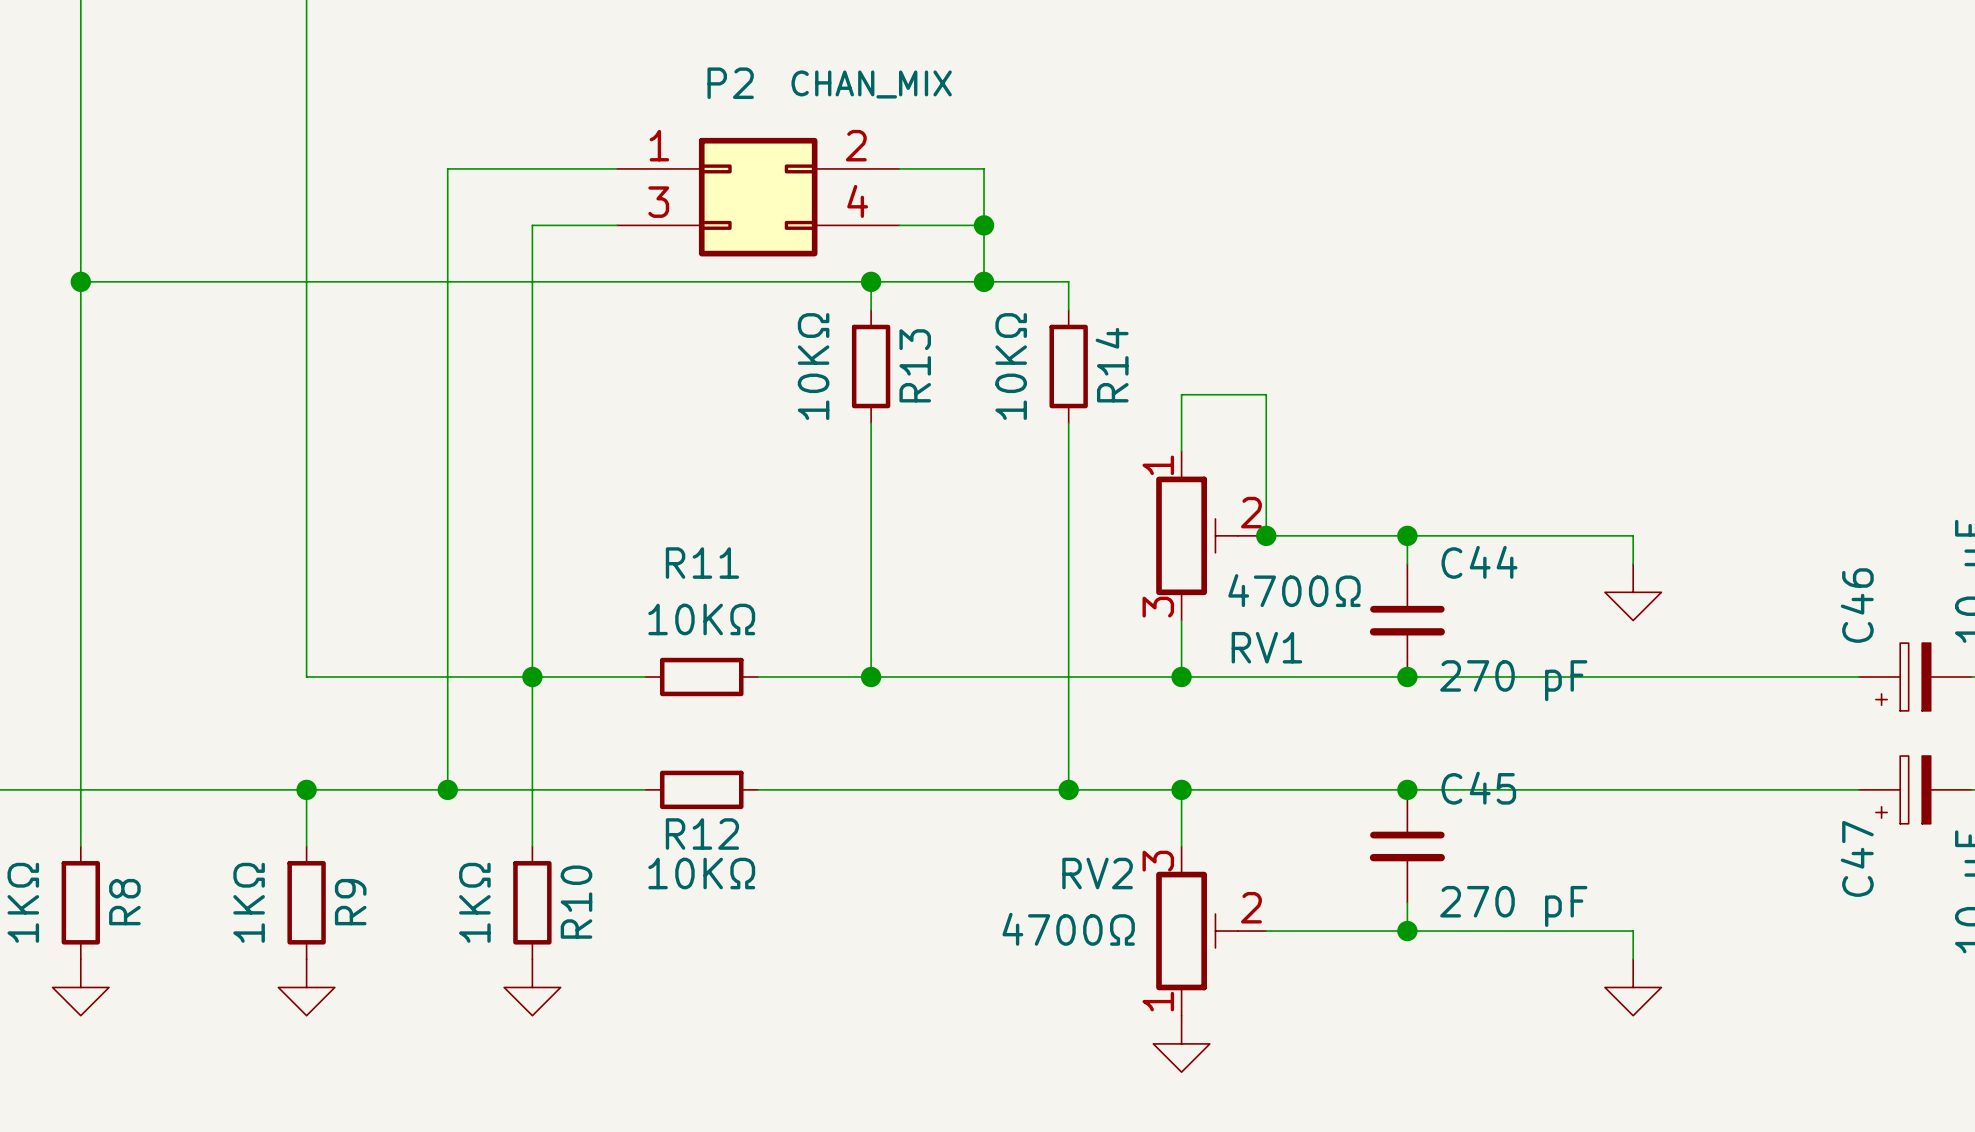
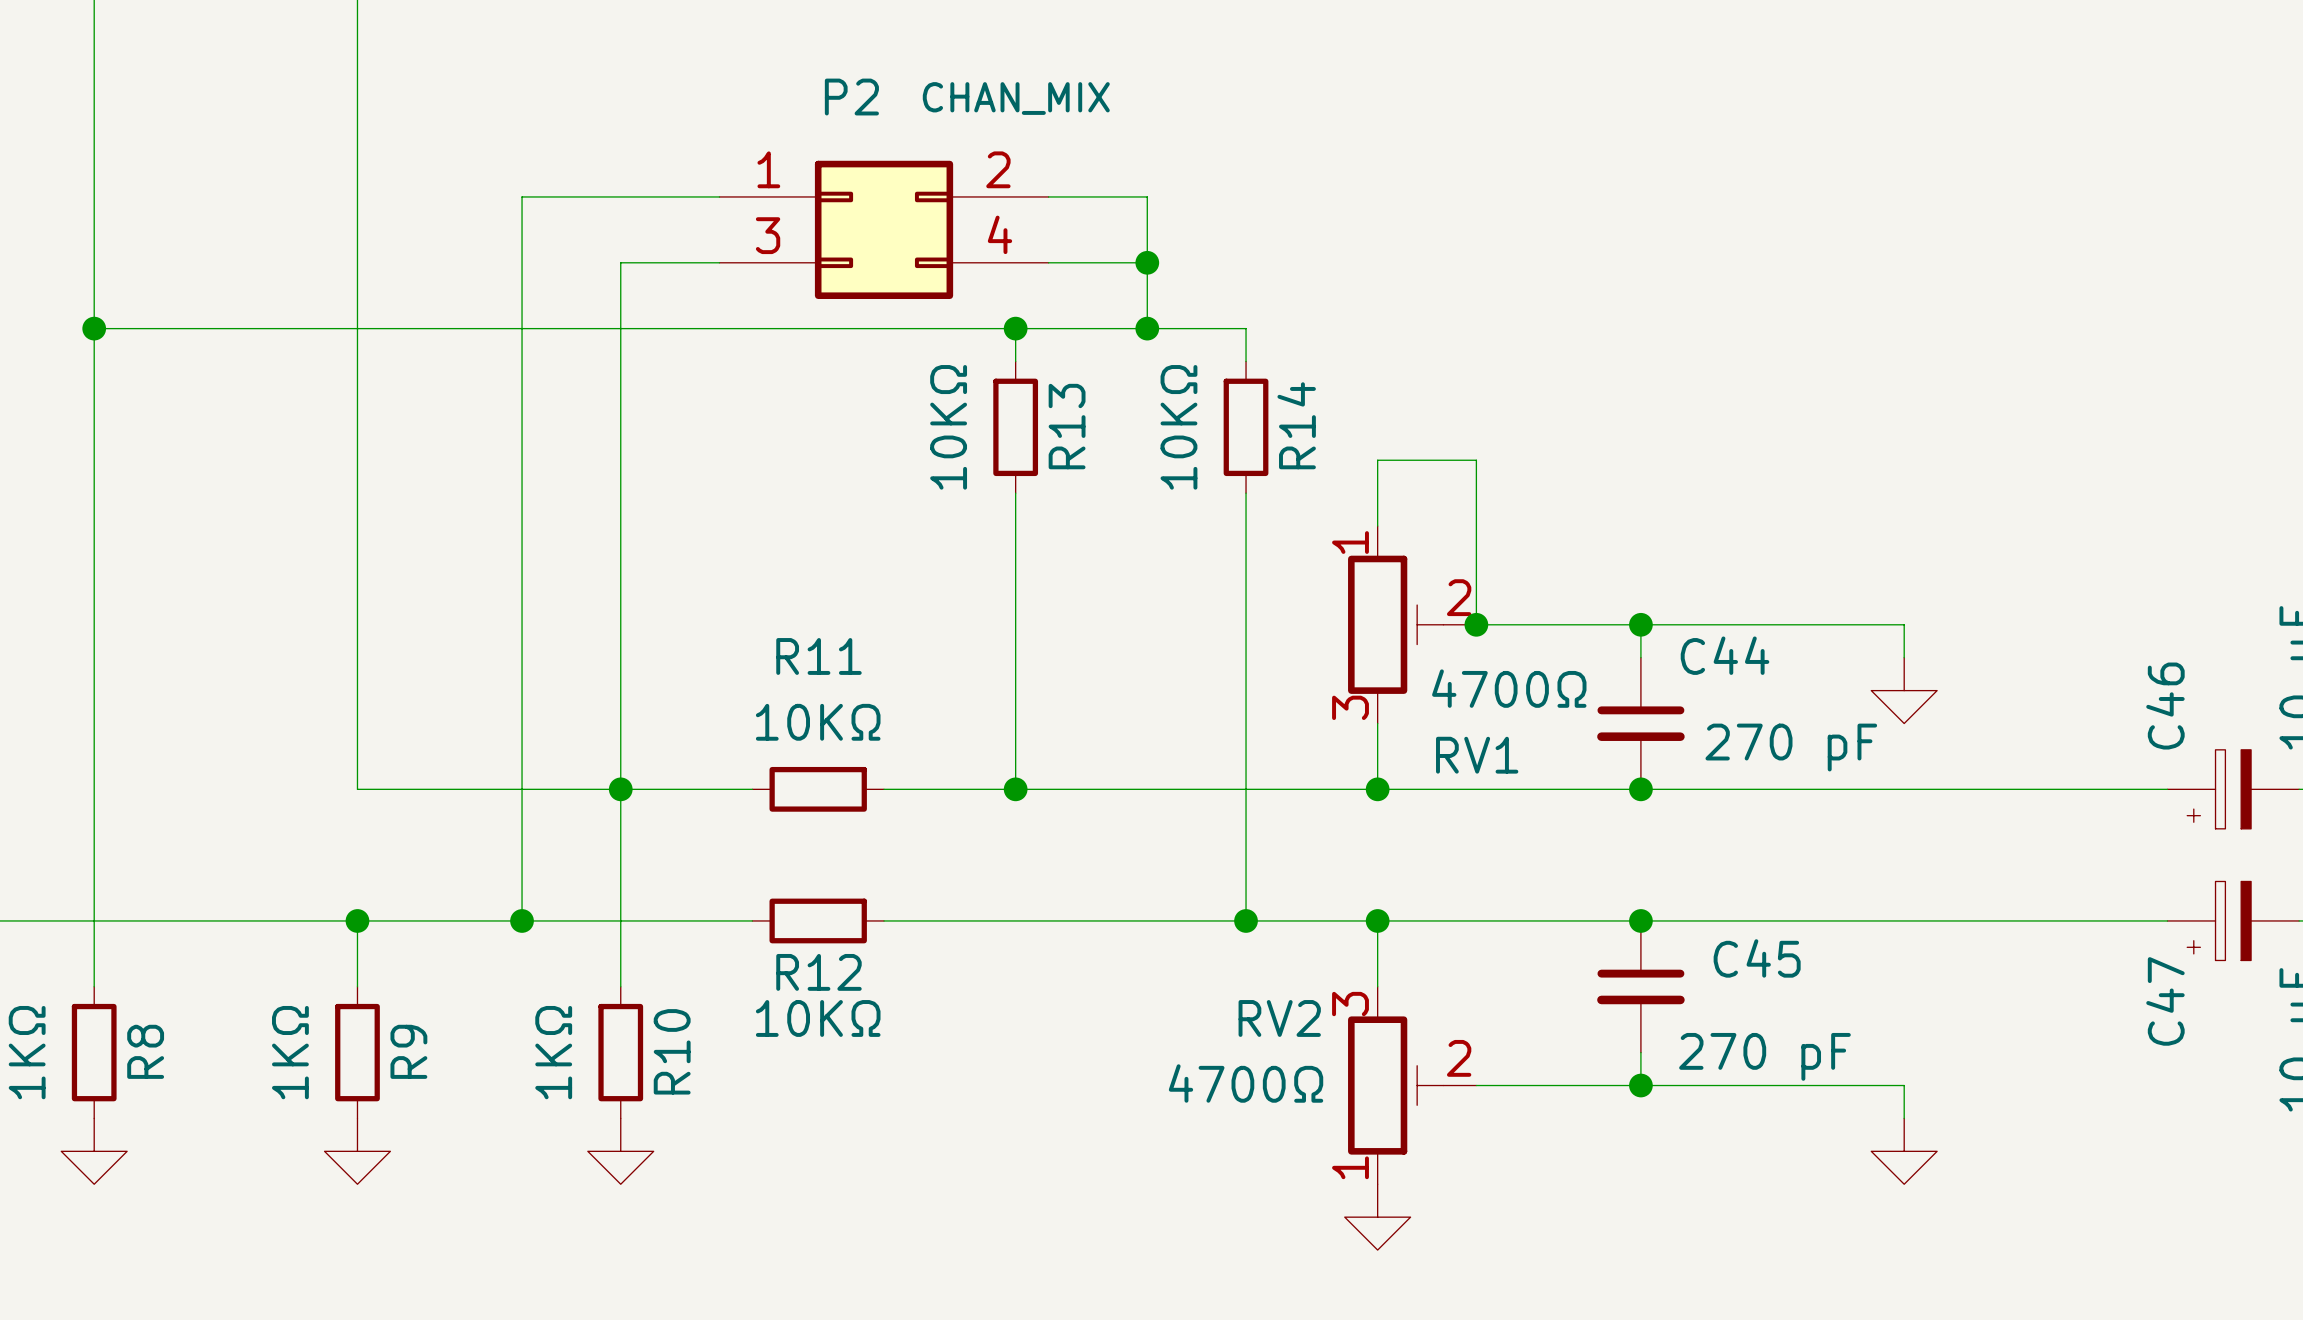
C44 value position: 270 pF (1513, 680) -> 270 pF (1791, 747)
C45 name position: C45 (1478, 788) -> C45 (1757, 958)

